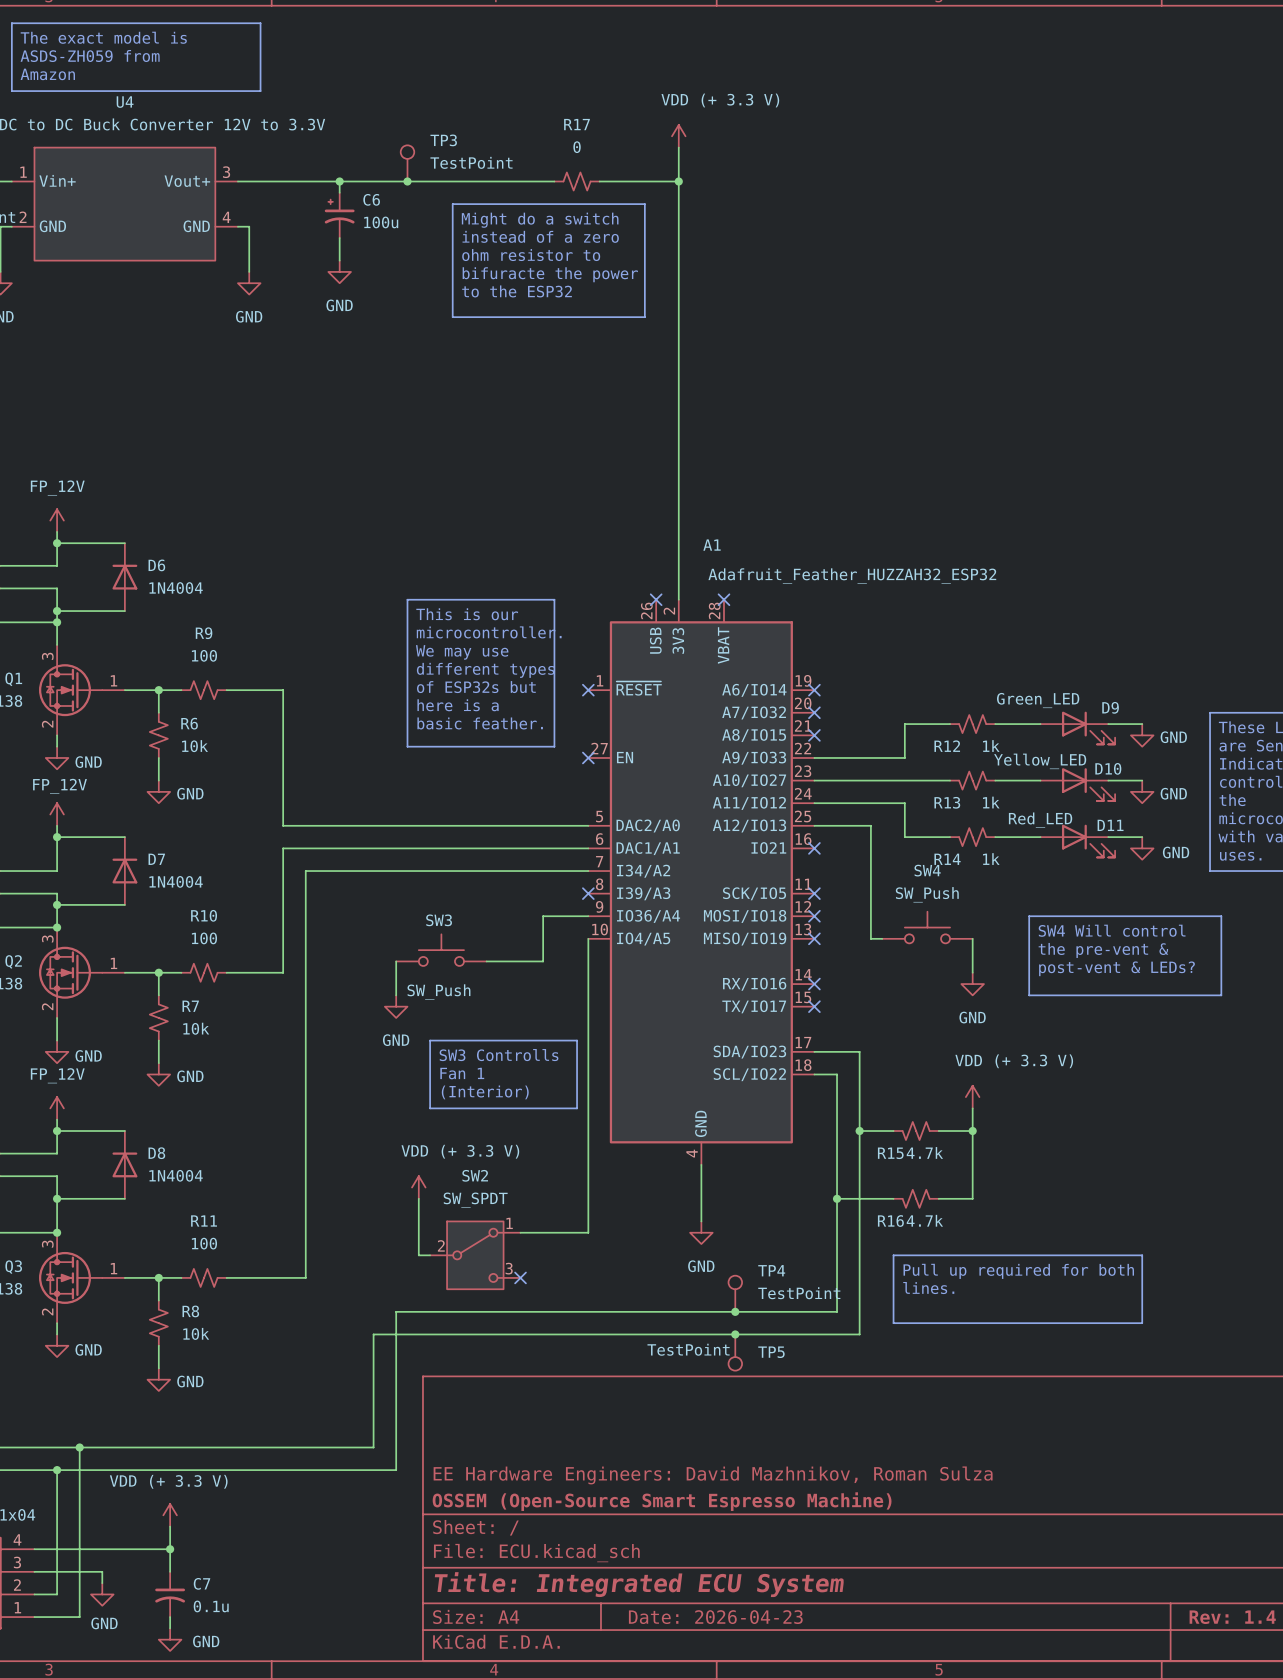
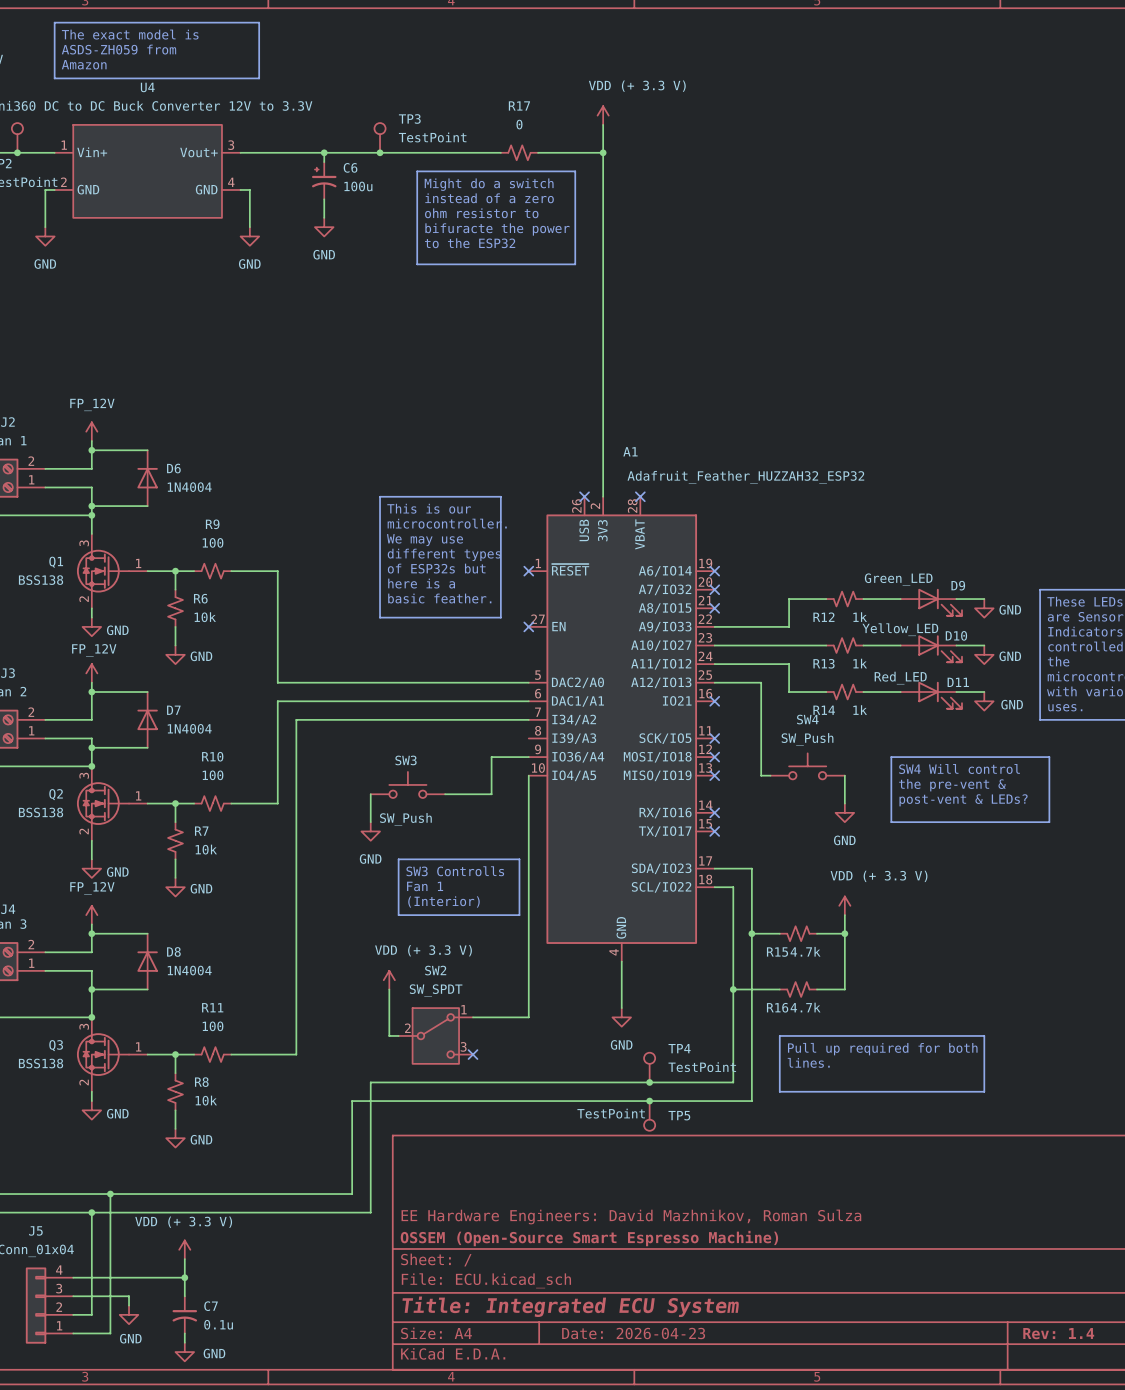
no-connect mark: (588, 893) -> none

